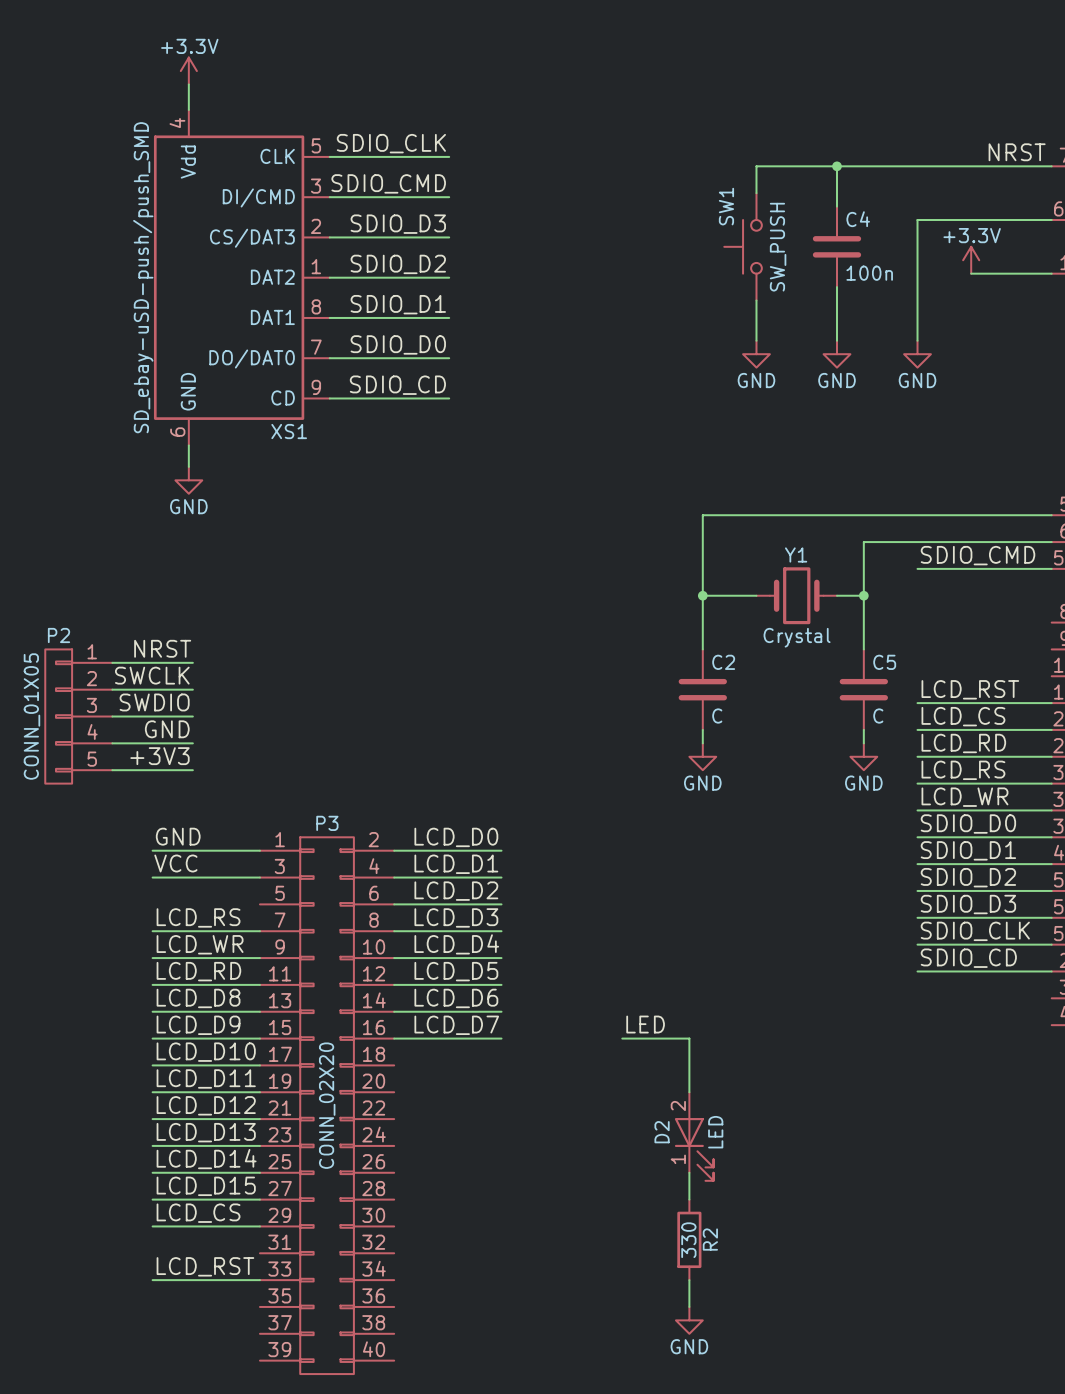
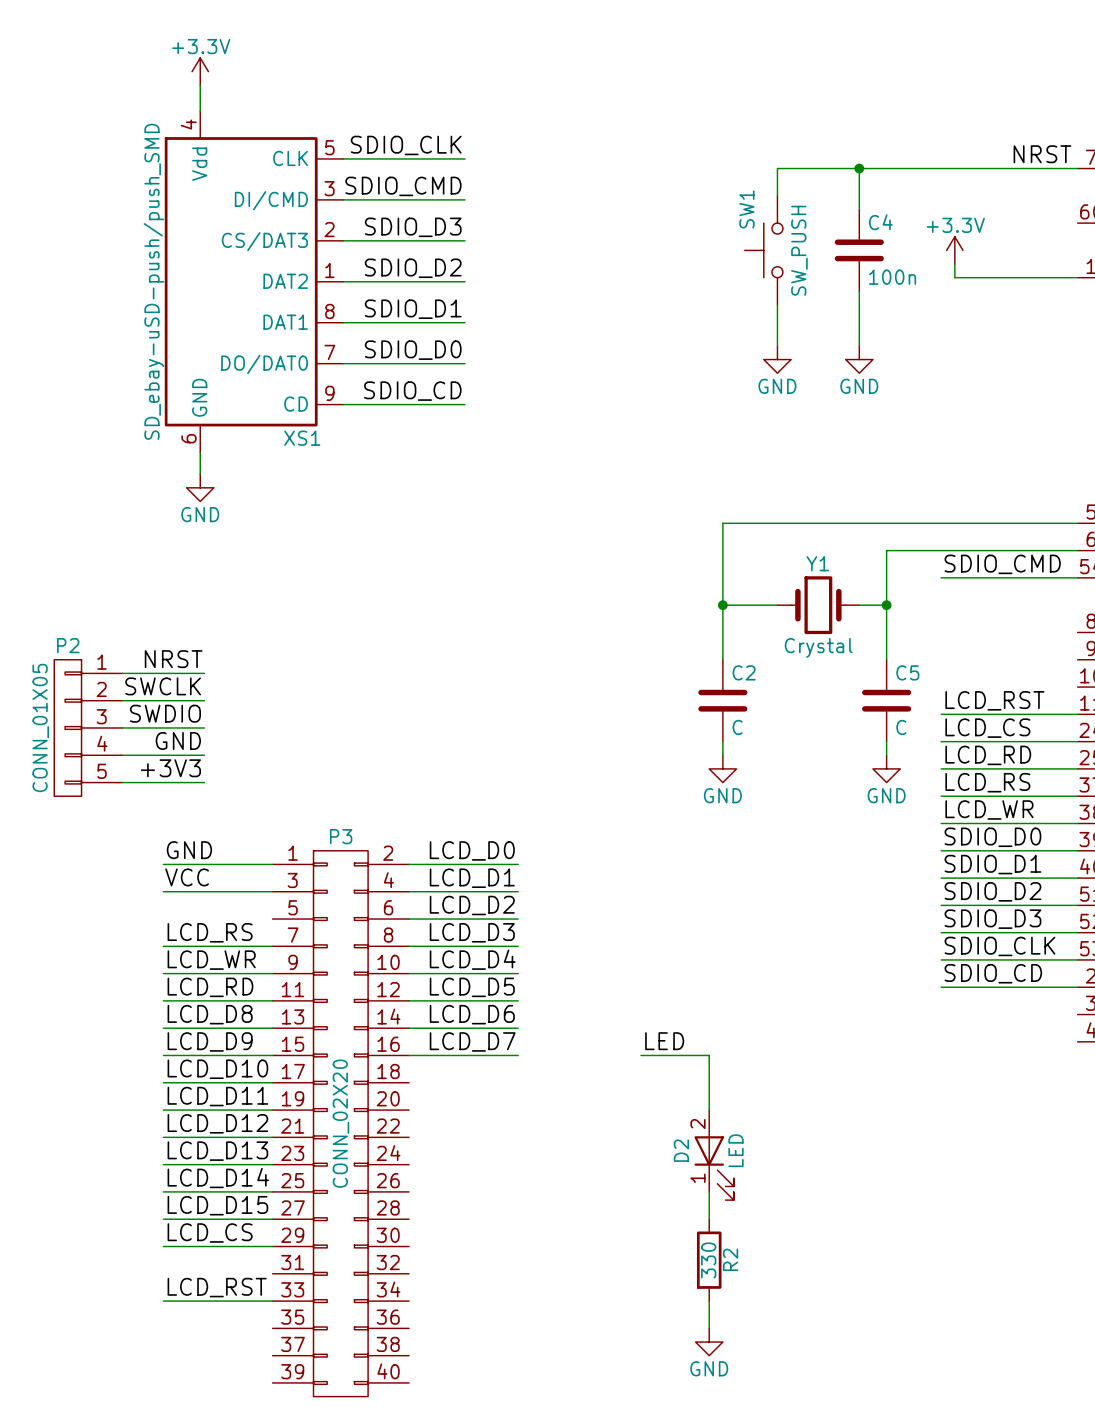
wire: (1051, 220) (917, 220) (917, 340) -> none
wire: none -> (954, 264) (954, 277) (995, 277)
power symbol position: +3.3V (971, 260) -> +3.3V (954, 250)
power symbol: GND (917, 354) -> none

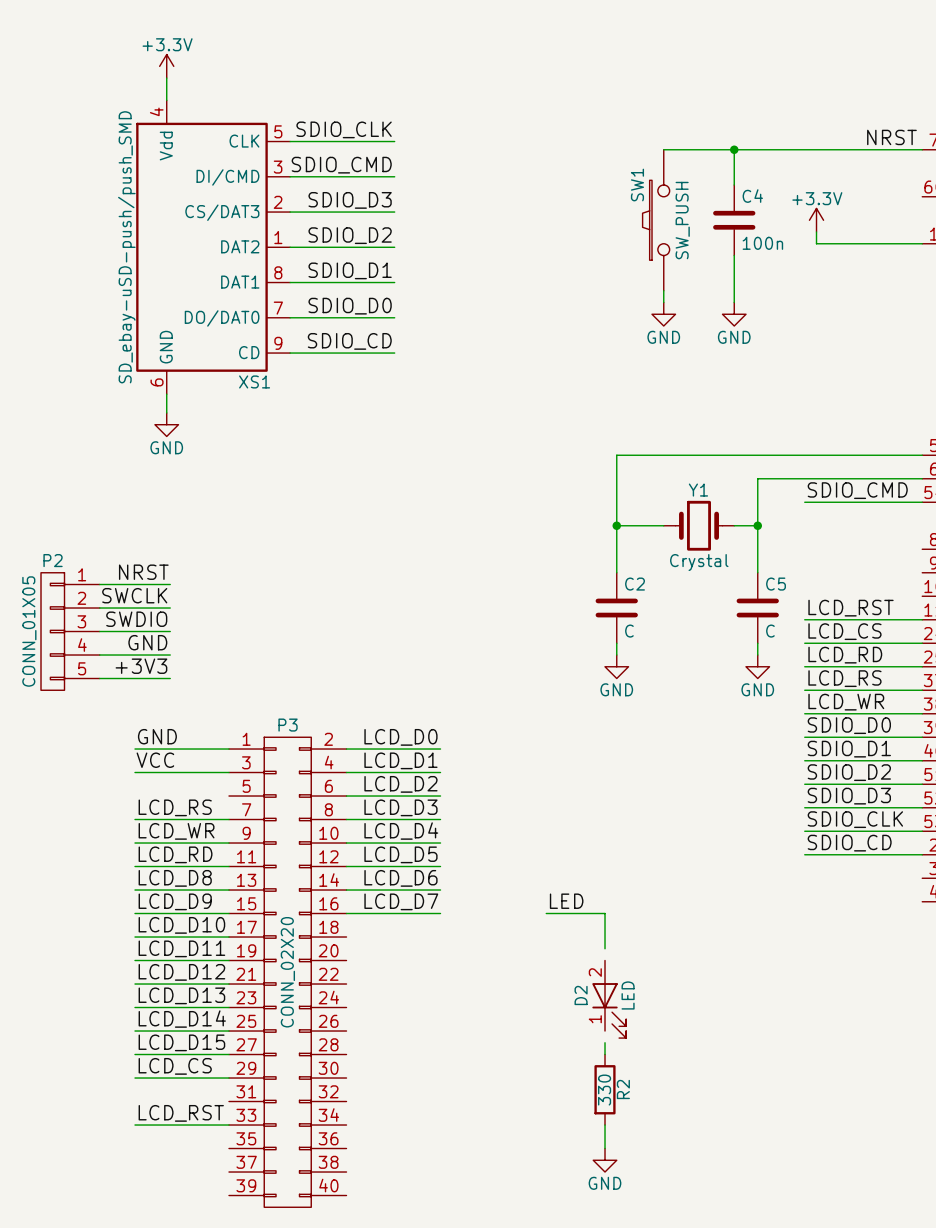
SW1 symbol: [744, 195, 783, 305] -> [642, 149, 670, 291]
wire: (709, 1096) (709, 1110) -> none
wire: (709, 1191) (709, 1205) -> none

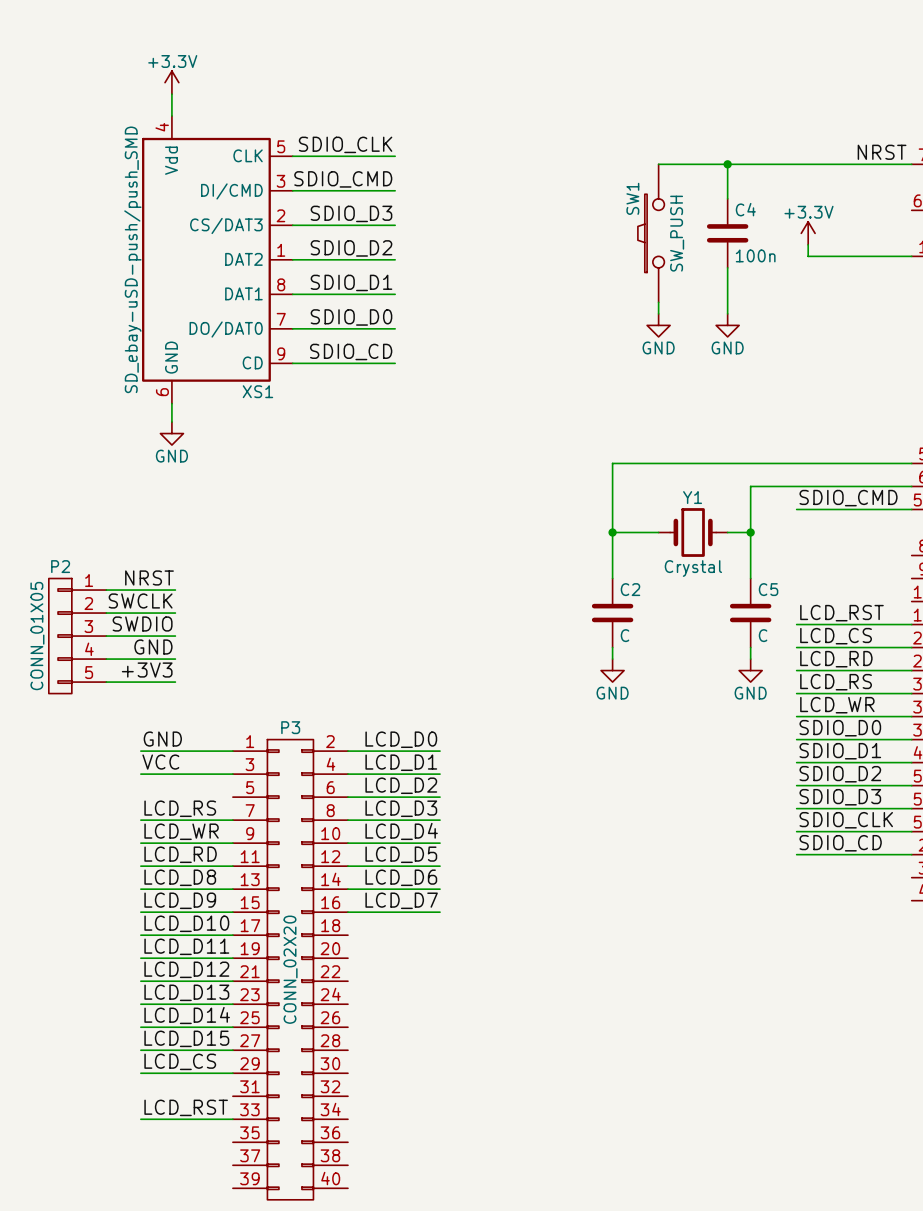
label: LED (566, 901) -> none
wire: (546, 913) (605, 913) (605, 948) -> none
D2: LED (609, 999) -> none
wire: (605, 1042) (605, 1054) -> none
R2: 330 (605, 1089) -> none
wire: (605, 1125) (605, 1148) -> none
power symbol: GND (605, 1160) -> none

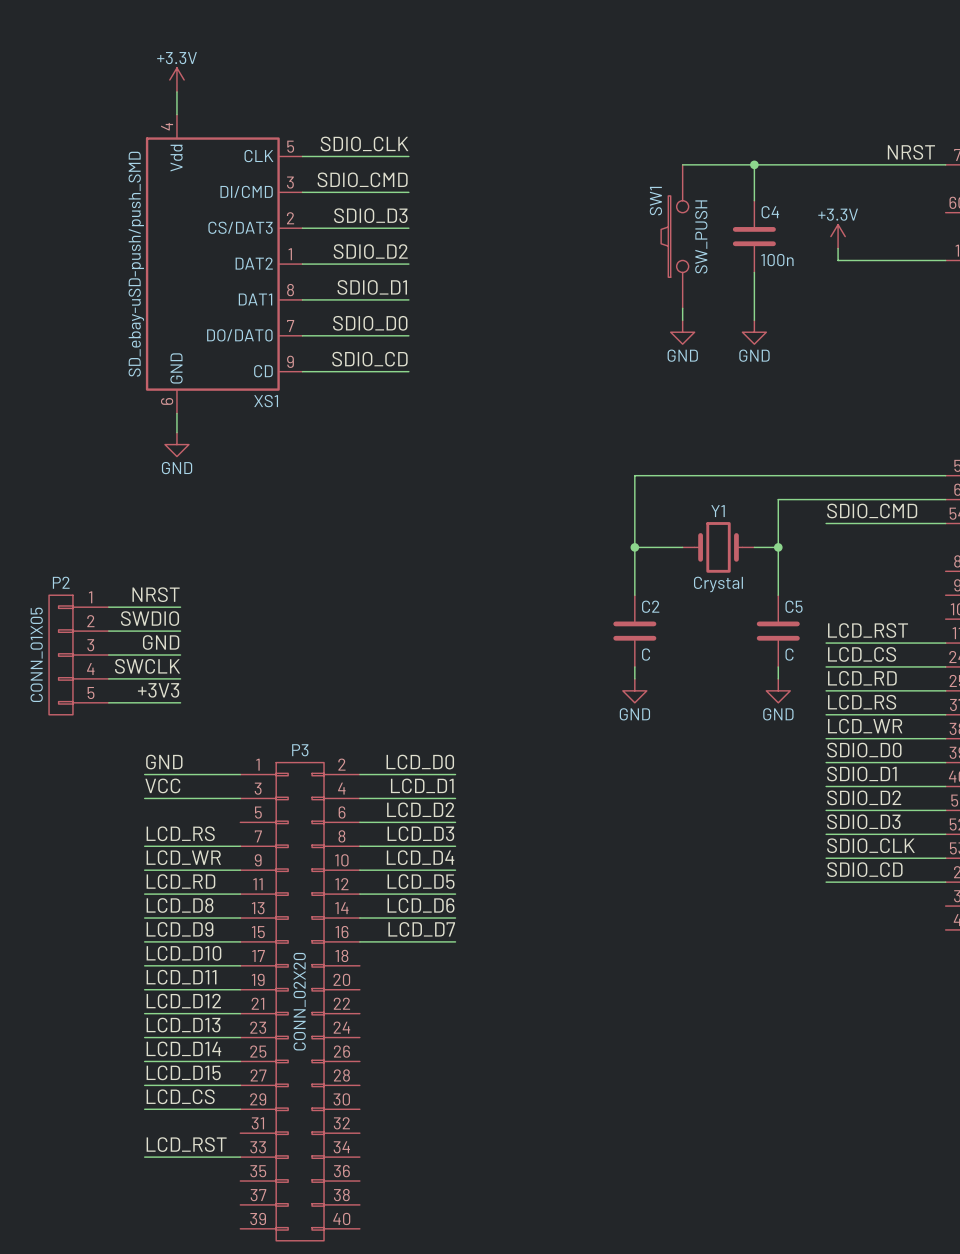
label: SWCLK (140, 600) -> SWDIO (149, 618)
label: SWDIO (142, 624) -> GND (161, 642)
label: GND (153, 647) -> SWCLK (147, 666)

